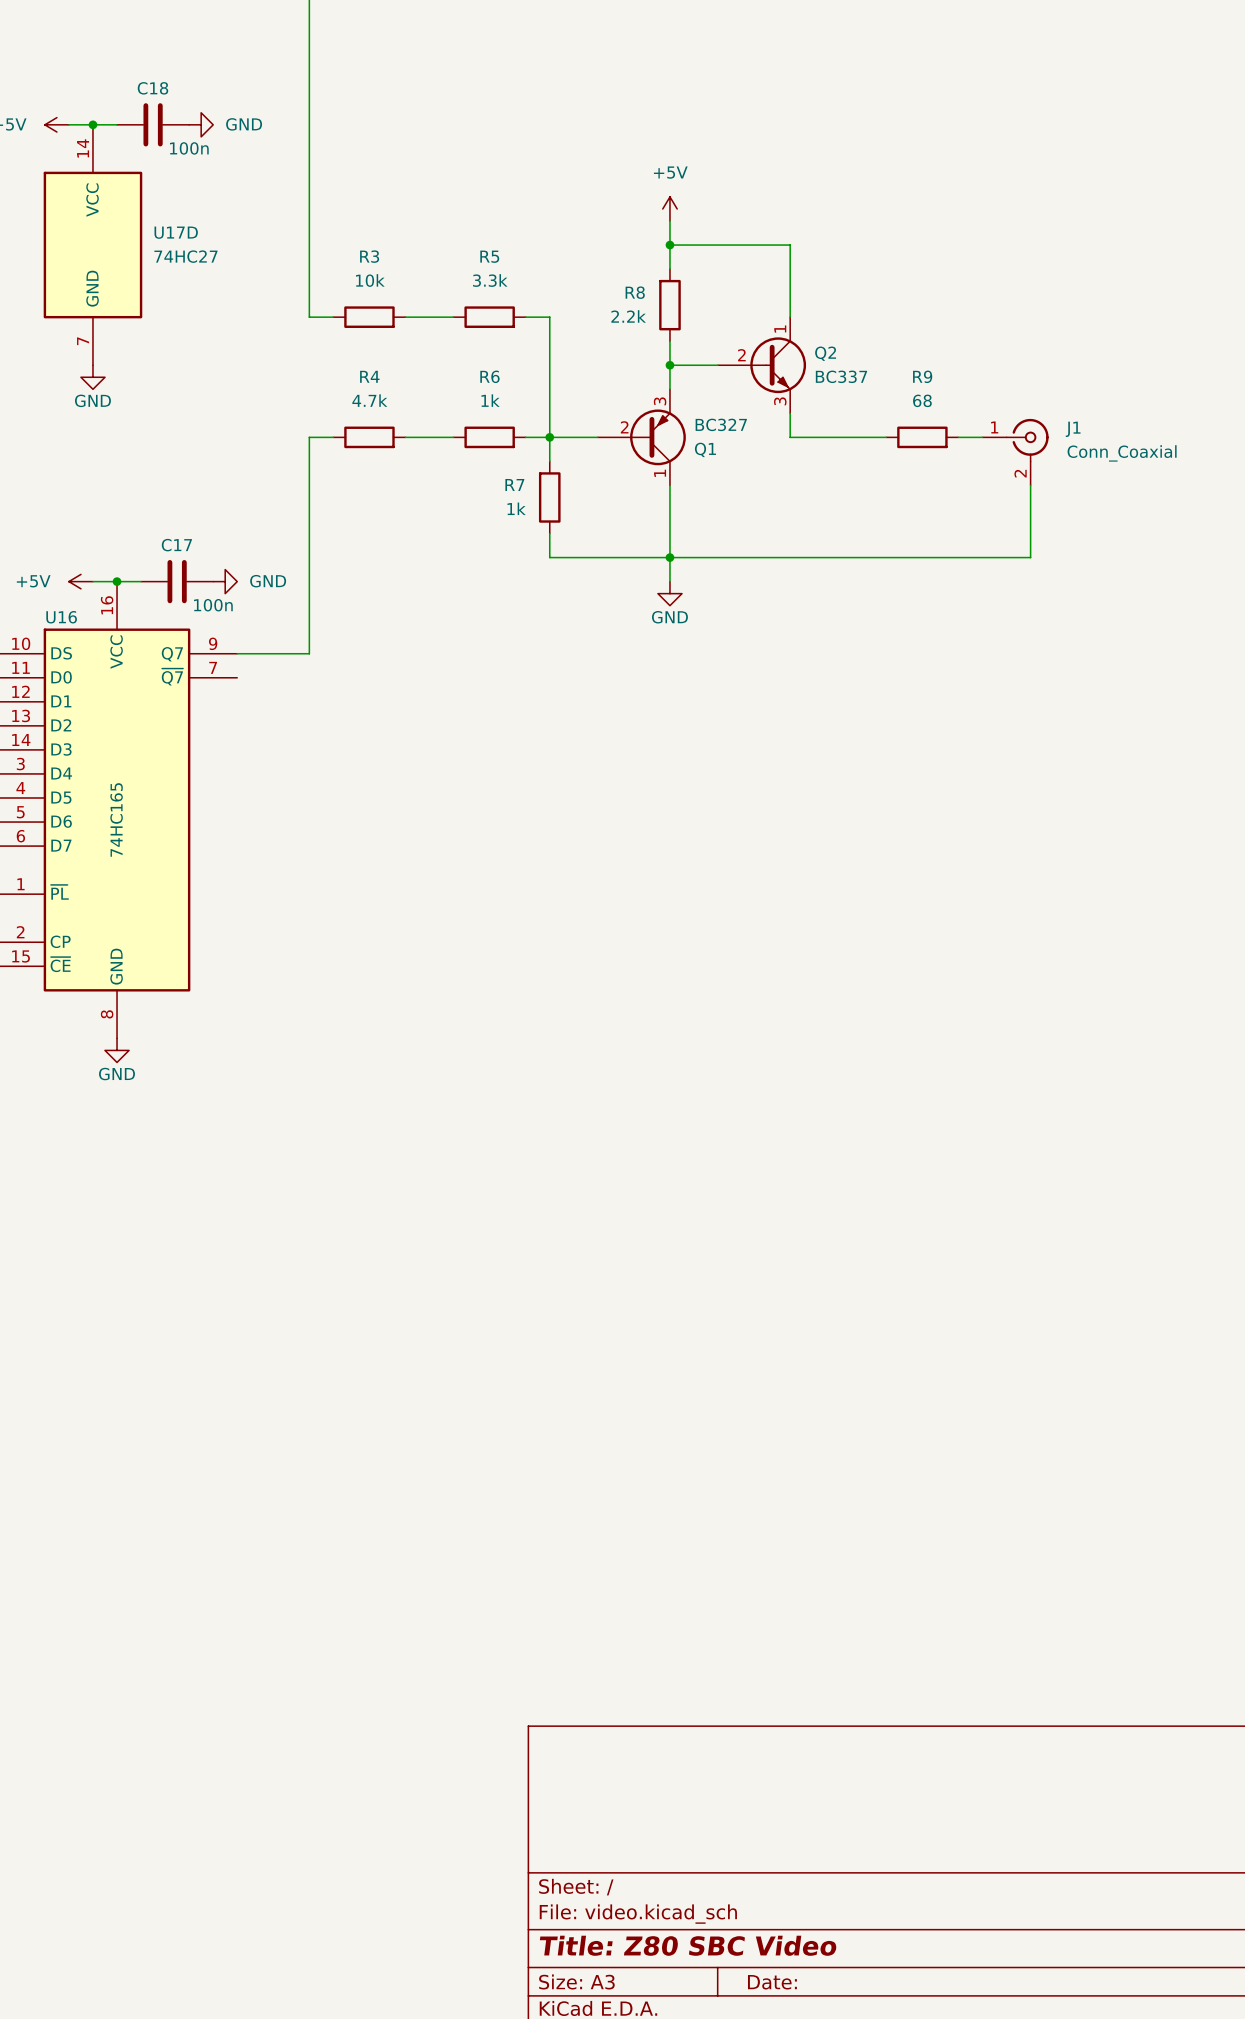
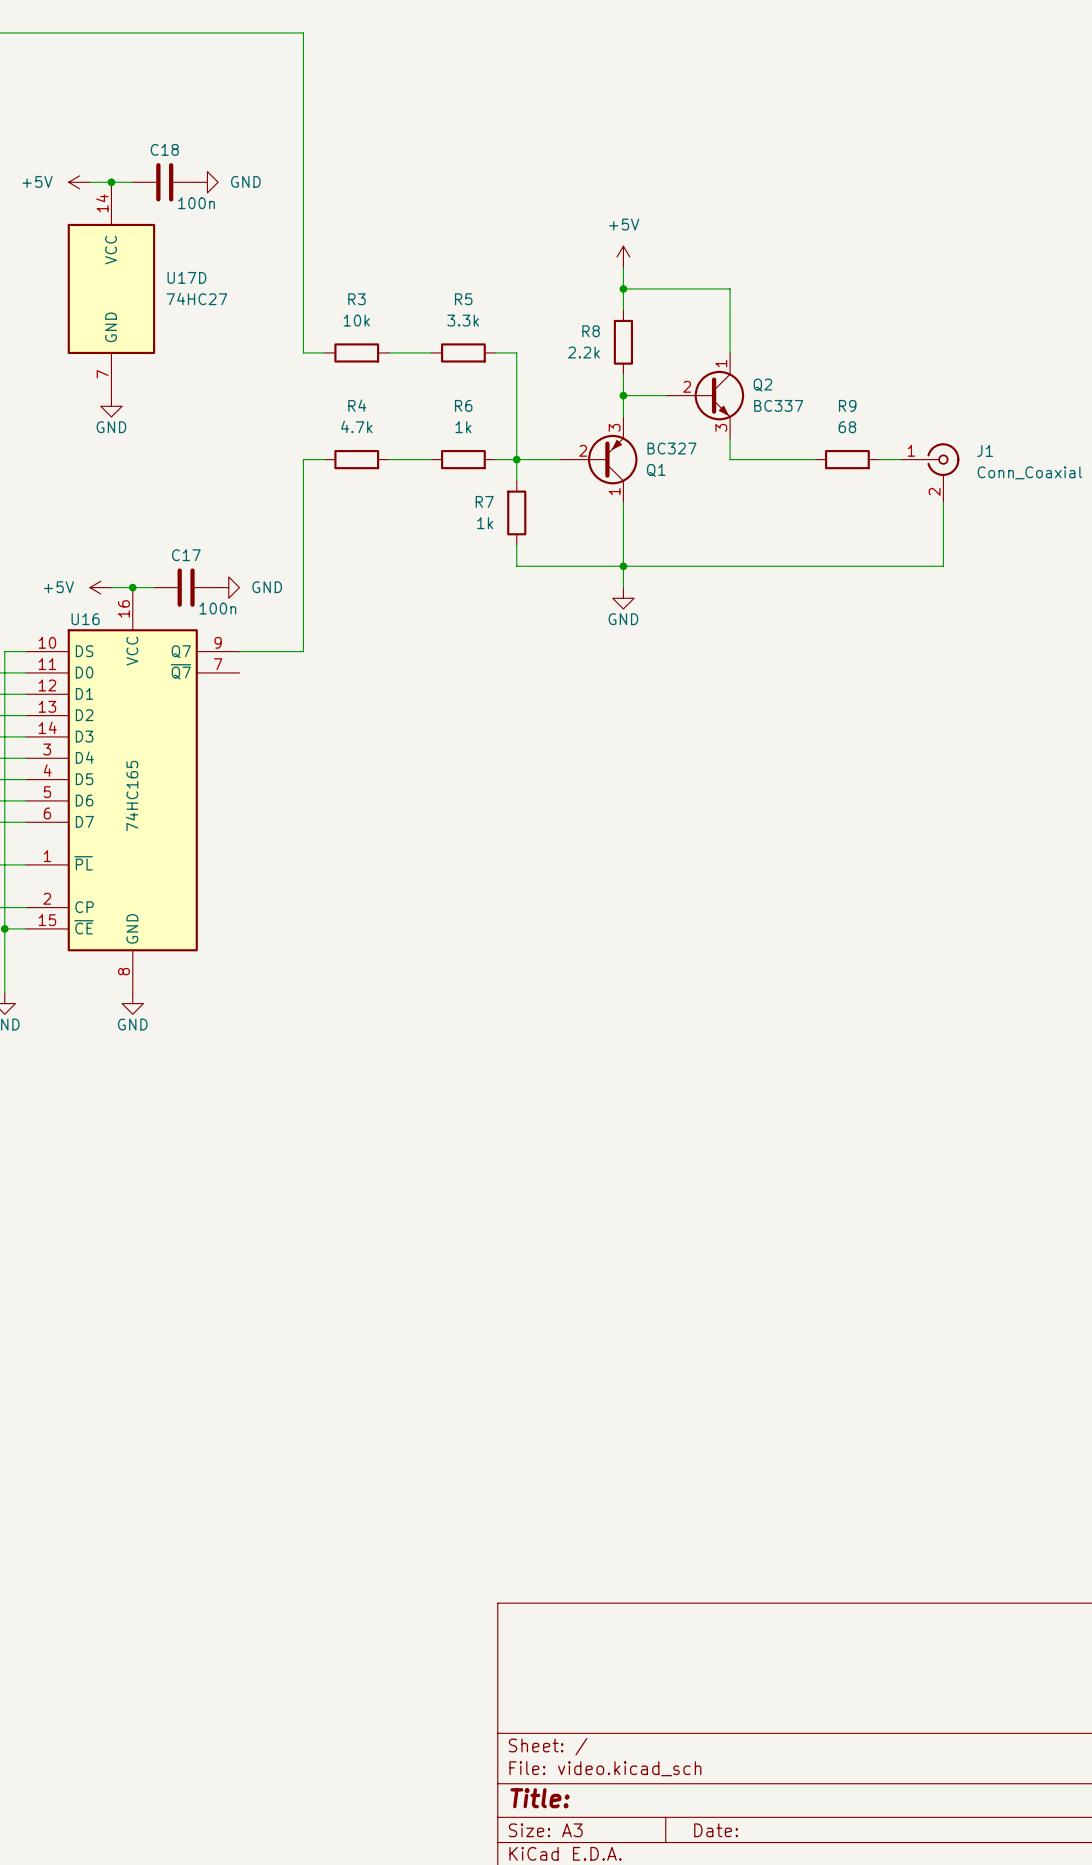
title block: Title: Z80 SBC Video (688, 1945) -> Title: (540, 1798)

